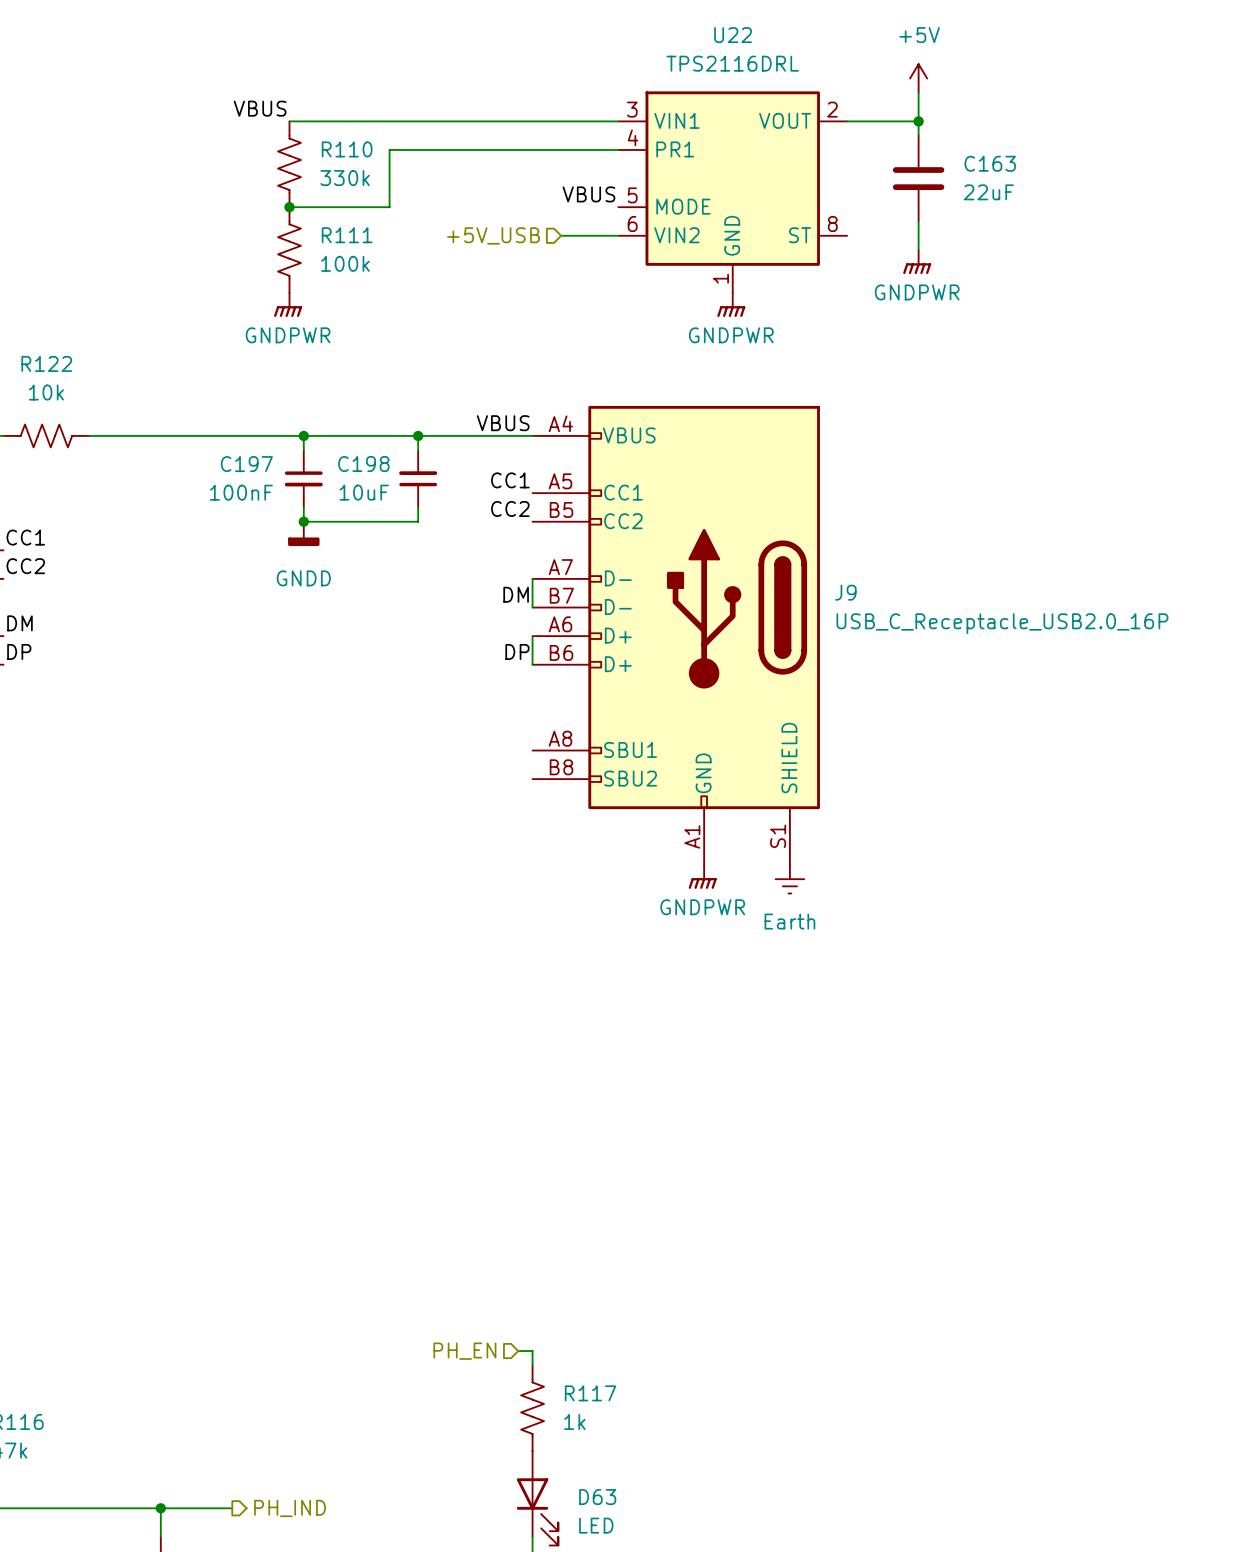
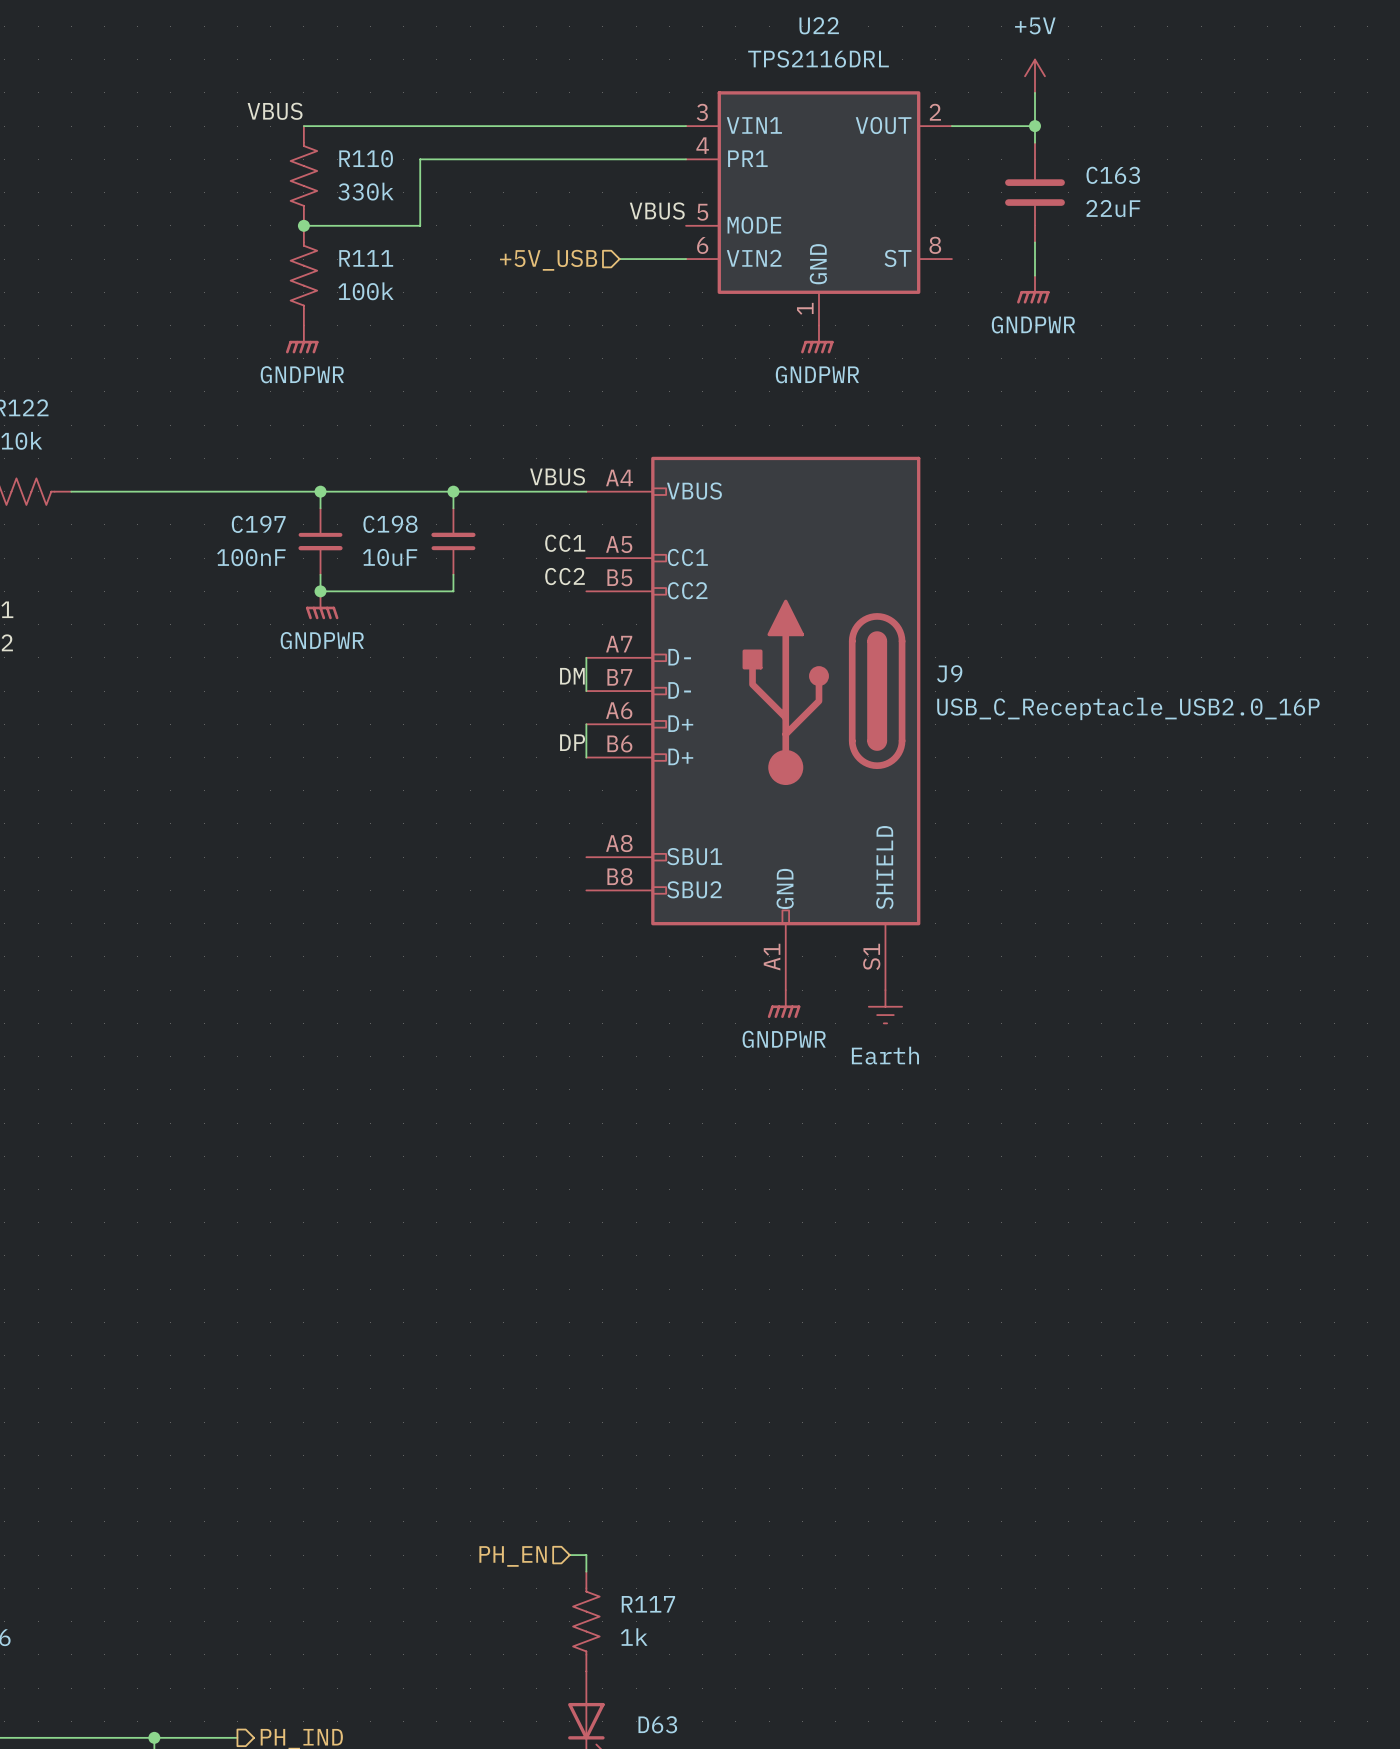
power symbol: GNDD (303, 533) -> GNDPWR (322, 605)

